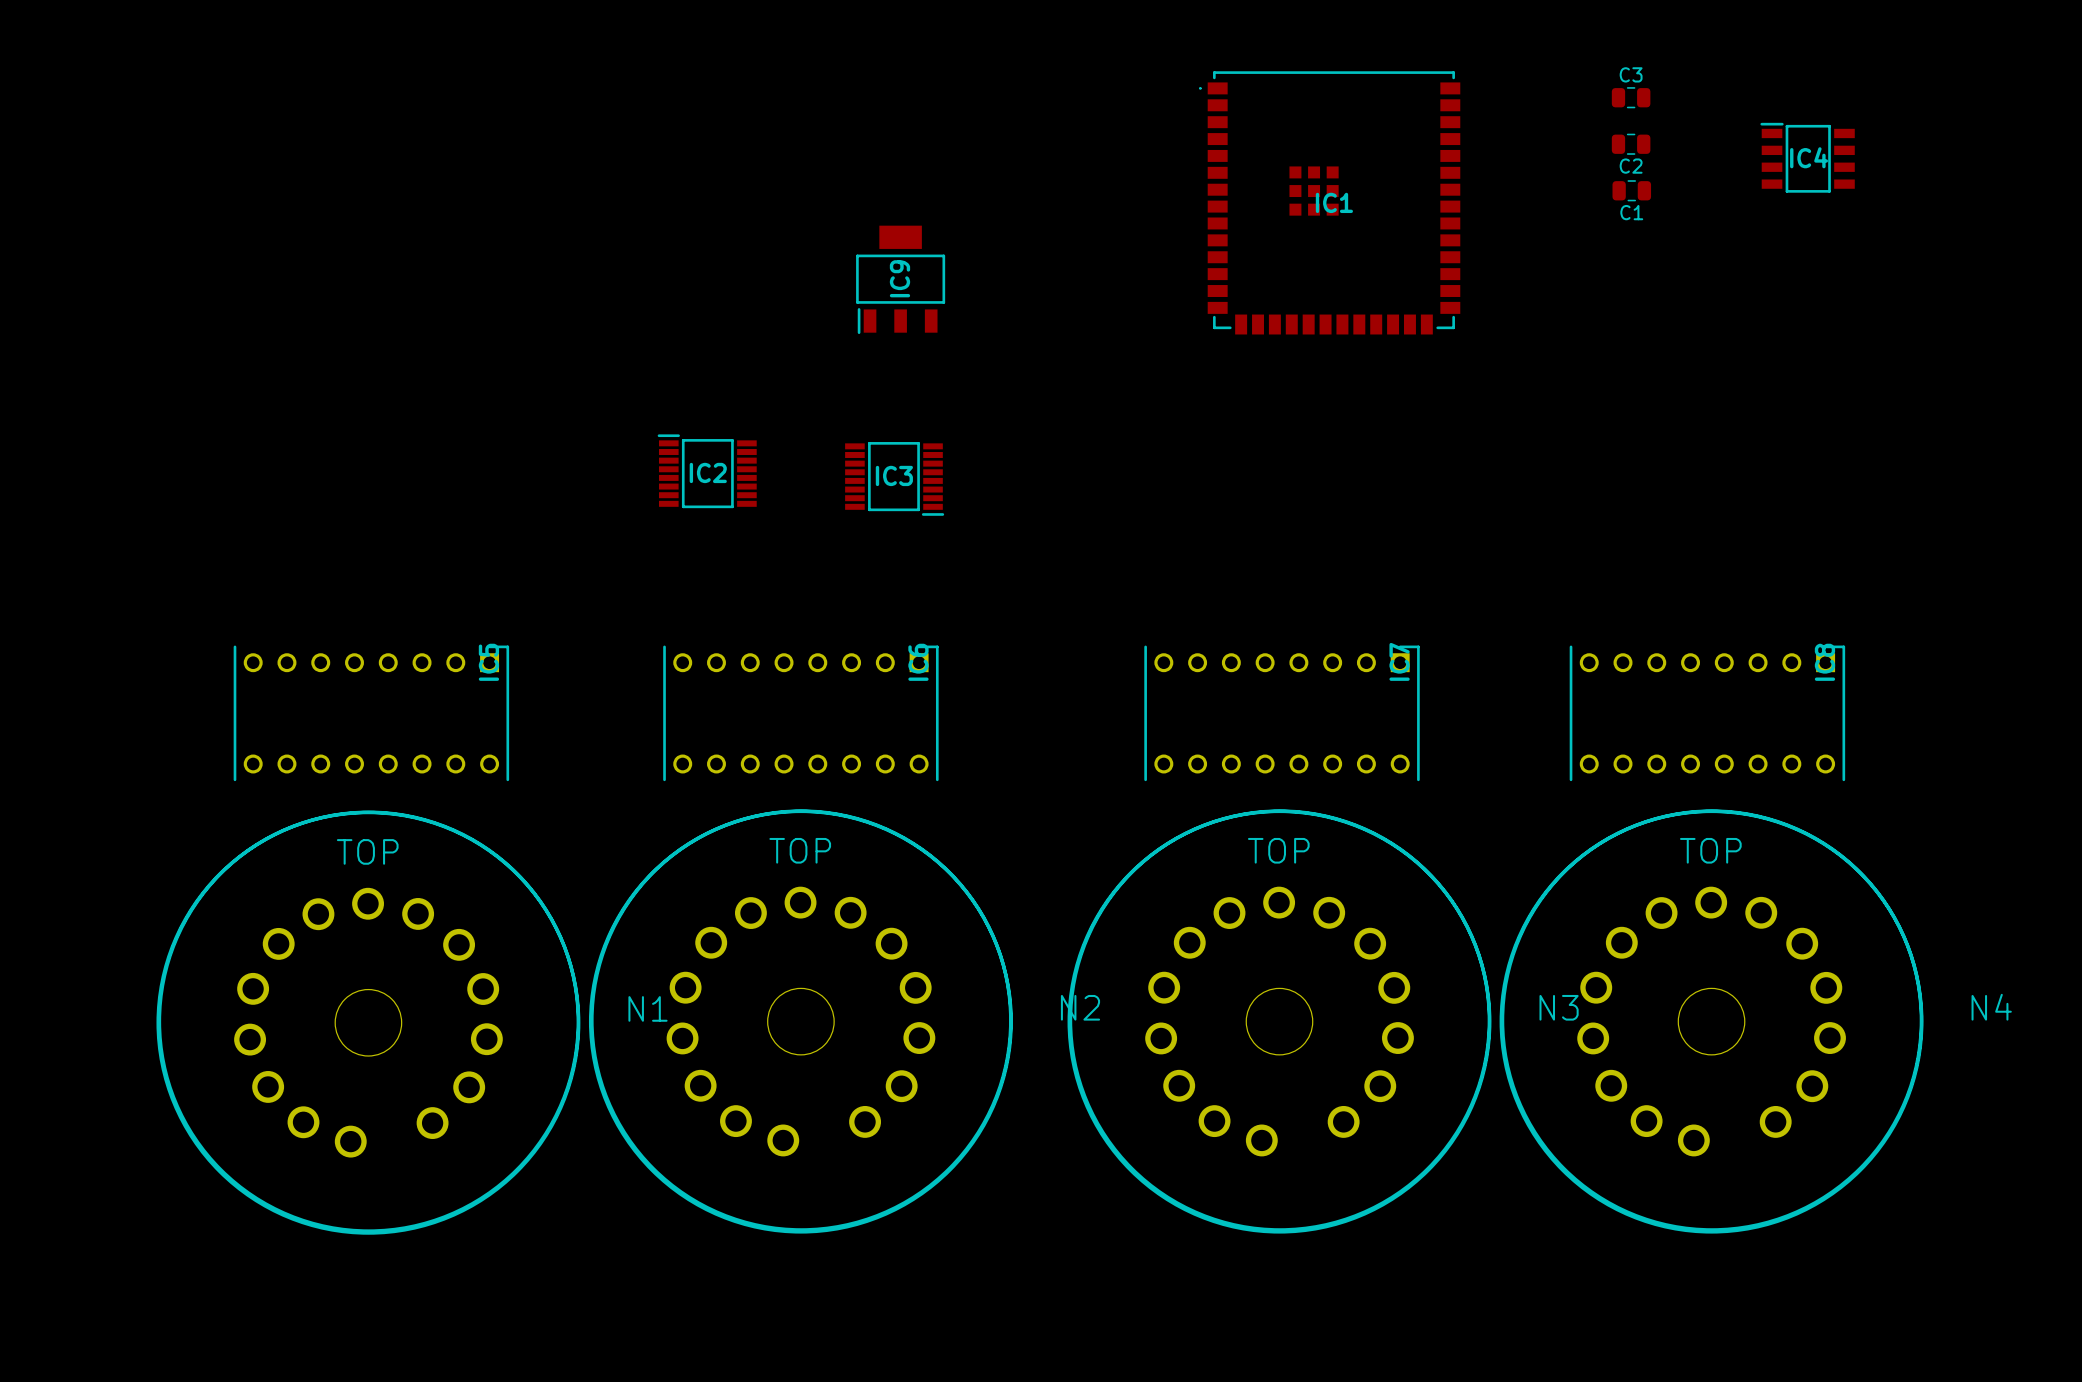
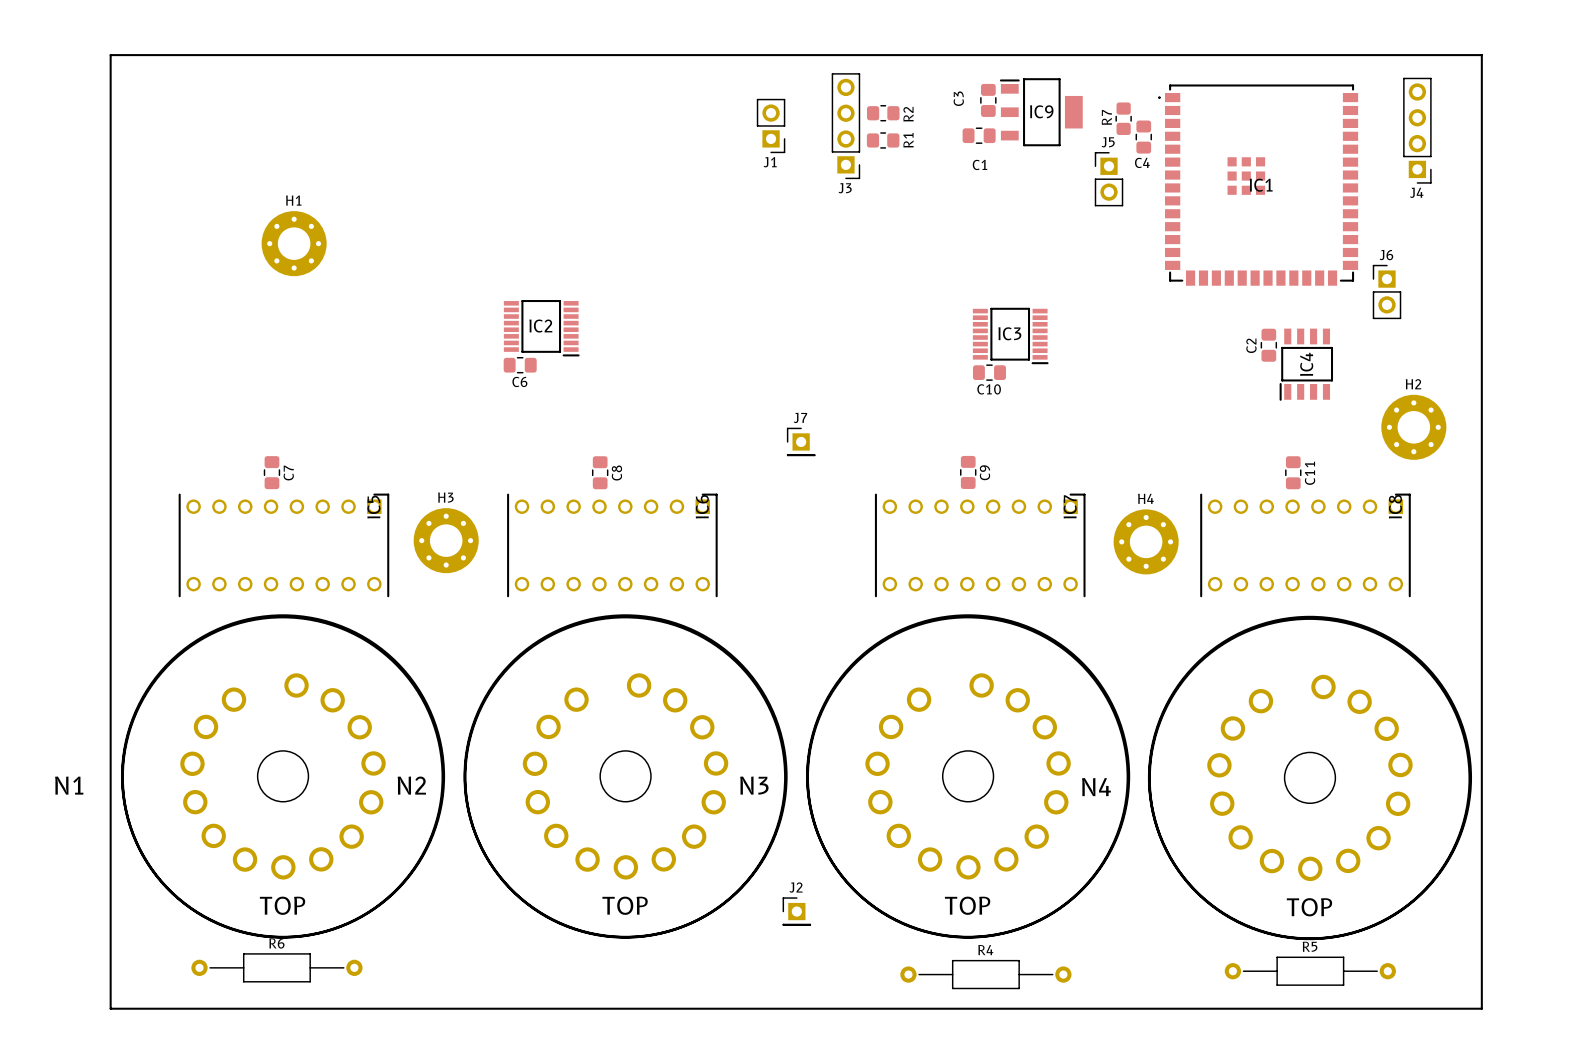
board edge: none -> (110, 55) (1481, 55) (1481, 1008) (110, 1008) (110, 55)
C3 name position: C3 (1631, 74) -> C3 (958, 98)
C3 footprint: [1611, 87, 1651, 109] -> [980, 83, 997, 117]
C2 footprint: [1611, 133, 1651, 155] -> [1260, 328, 1277, 362]
R2: none -> (883, 113)
R7: none -> (1123, 118)
IC4 rotation: 0° (1807, 157) -> 90° counterclockwise (1306, 364)
IC4 position: (1807, 157) -> (1306, 364)
J1: none -> (771, 125)
J3: none -> (845, 126)
C2 name position: C2 (1631, 166) -> C2 (1251, 345)
J4: none -> (1417, 130)
C4: none -> (1143, 137)
C1 footprint: [1612, 180, 1652, 202] -> [962, 127, 996, 144]
R1: none -> (883, 140)
IC1 position: (1329, 202) -> (1258, 185)
J5: none -> (1109, 179)
IC9 rotation: 0° (900, 279) -> 90° clockwise (1041, 112)
IC9 position: (900, 279) -> (1041, 112)
H1: none -> (294, 243)
J6: none -> (1387, 291)
IC2 rotation: 0° (707, 471) -> 180° (541, 328)
C6: none -> (520, 365)
IC3 position: (894, 478) -> (1010, 335)
C10: none -> (989, 372)
H2: none -> (1413, 427)
J7: none -> (801, 441)
C9: none -> (968, 472)
C7: none -> (271, 472)
C8: none -> (600, 472)
C11: none -> (1293, 472)
H3: none -> (446, 540)
H4: none -> (1146, 541)
N2 rotation: 0° (800, 1021) -> 180° (625, 776)
N3 rotation: 0° (1279, 1021) -> 180° (968, 776)
N4 rotation: 0° (1711, 1021) -> 180° (1309, 777)
N1 rotation: 0° (368, 1022) -> 180° (283, 776)
J2: none -> (796, 911)
R6: none -> (276, 967)
R5: none -> (1310, 971)
R4: none -> (985, 974)

